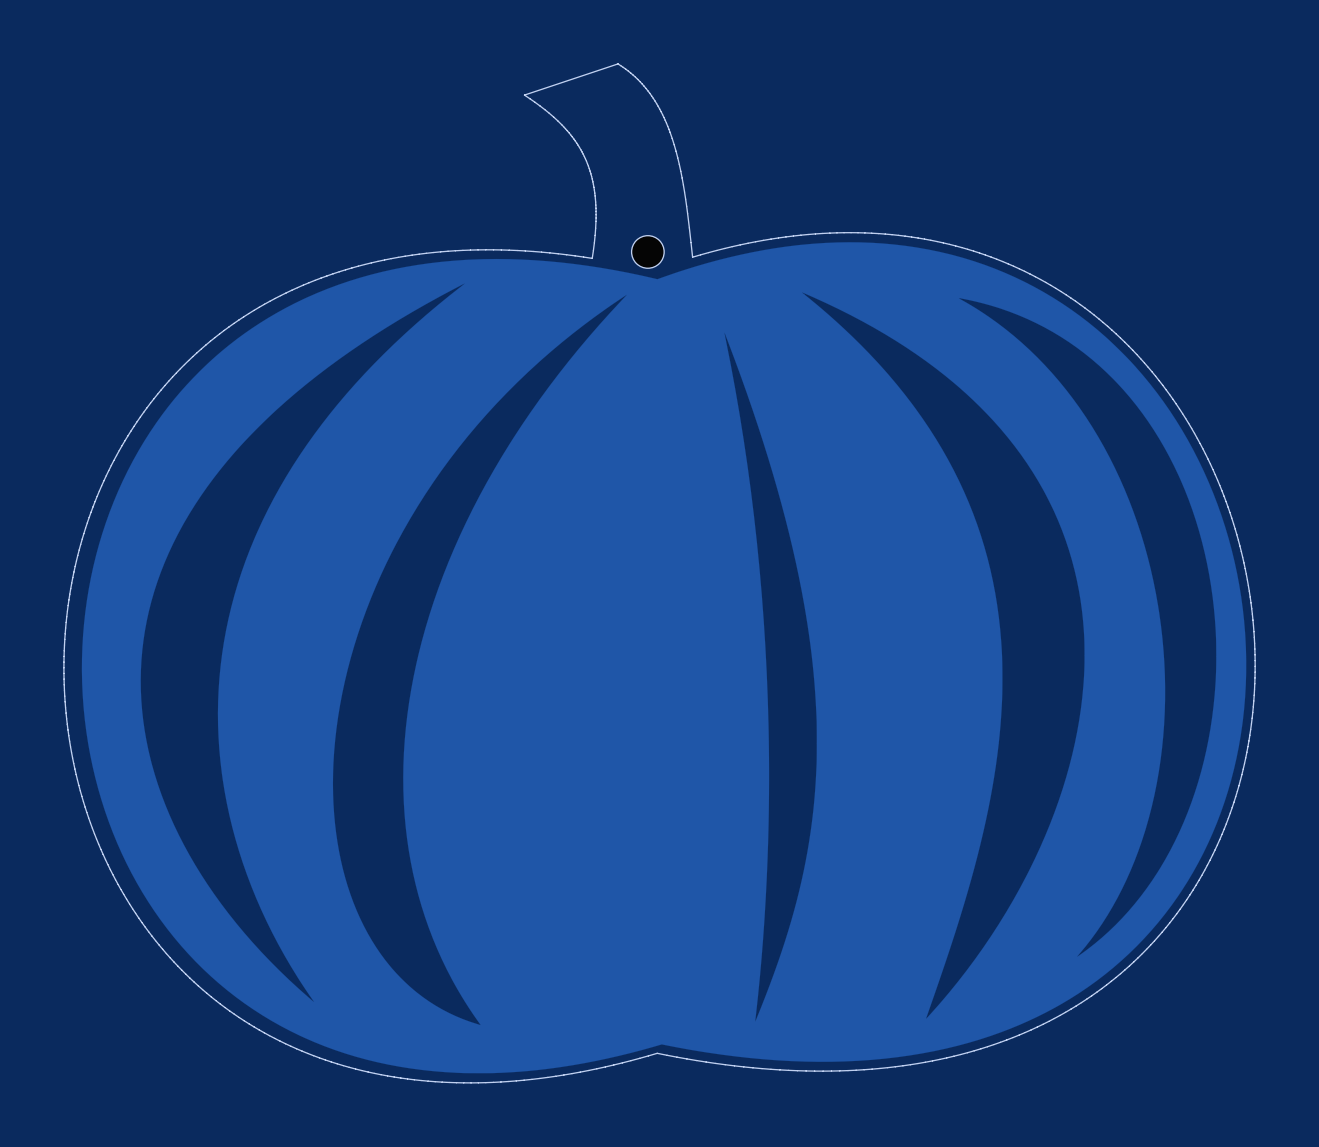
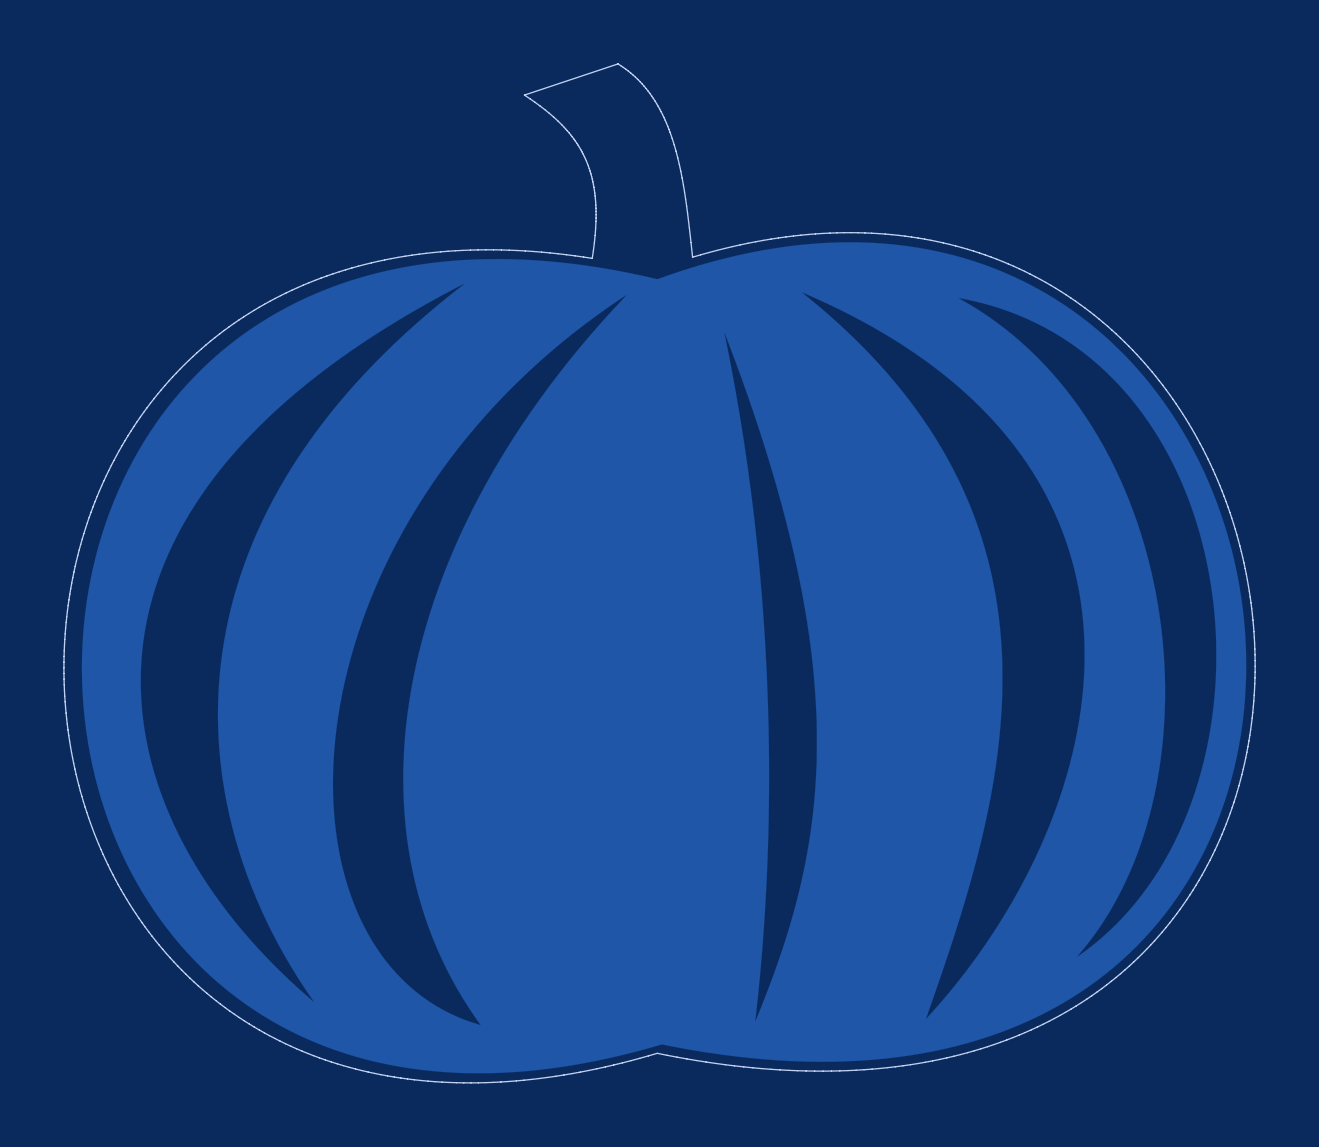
part: (647, 251) -> none

